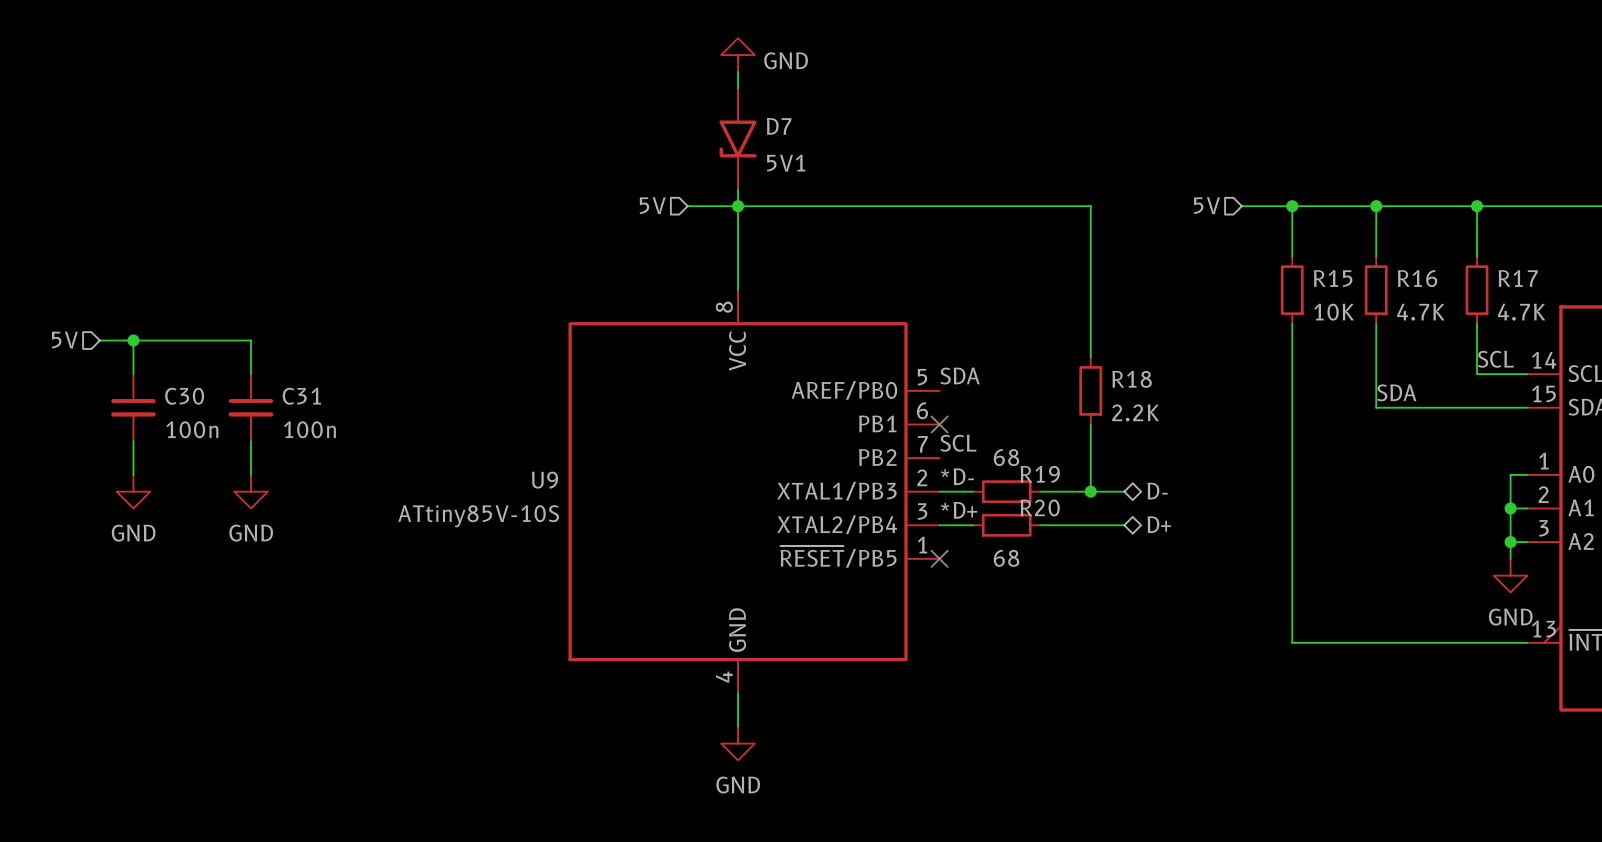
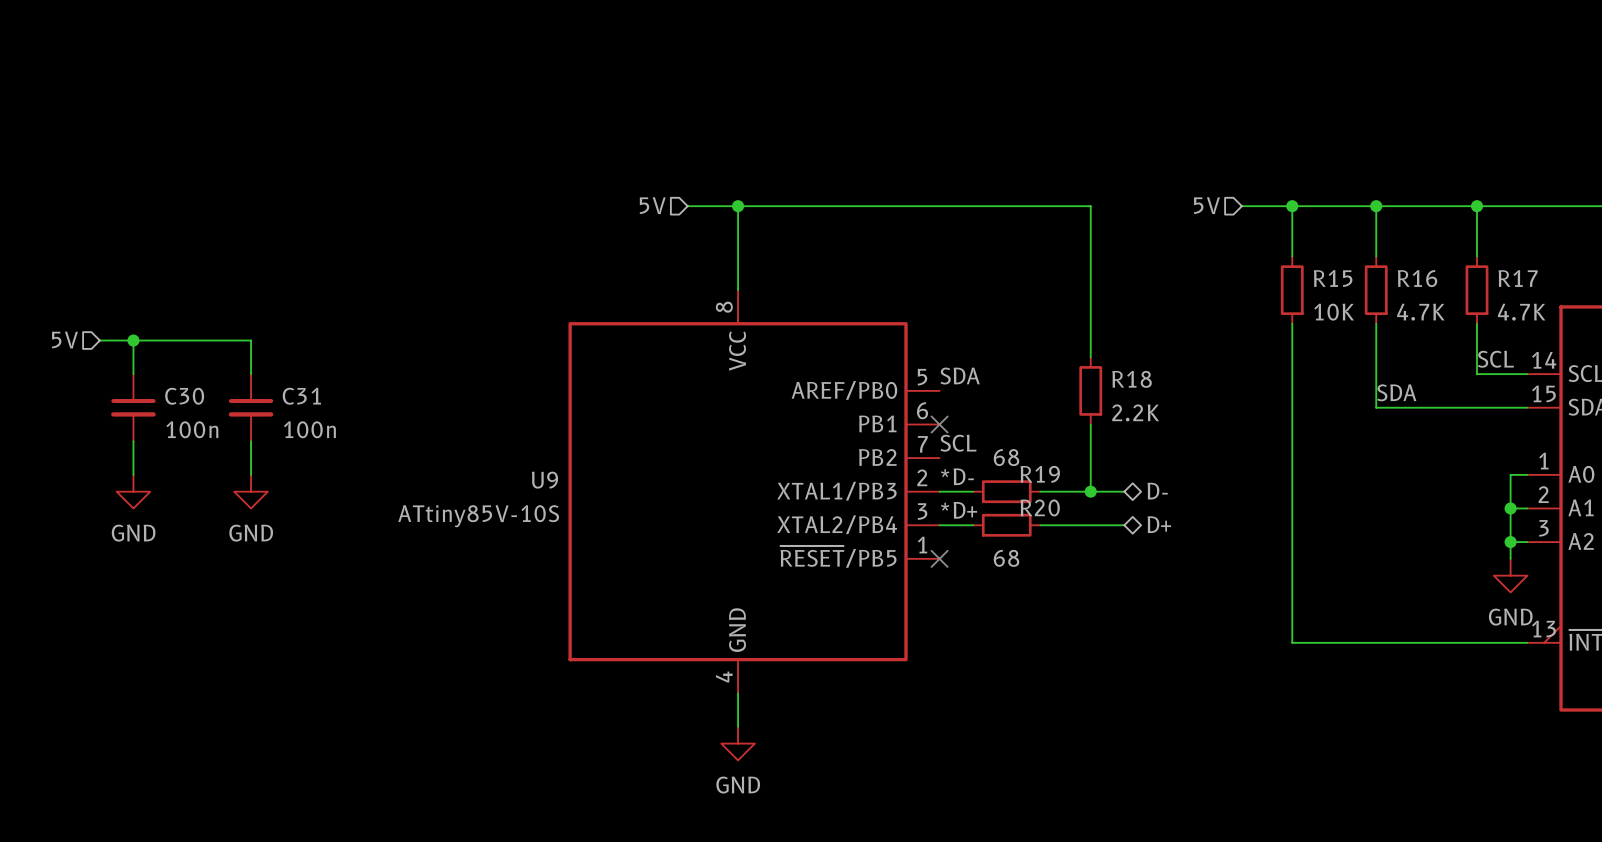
power symbol: GND (738, 55) -> none
wire: (738, 71) (738, 88) -> none
D7: 5V1 (738, 139) -> none
wire: (738, 189) (738, 206) -> none

